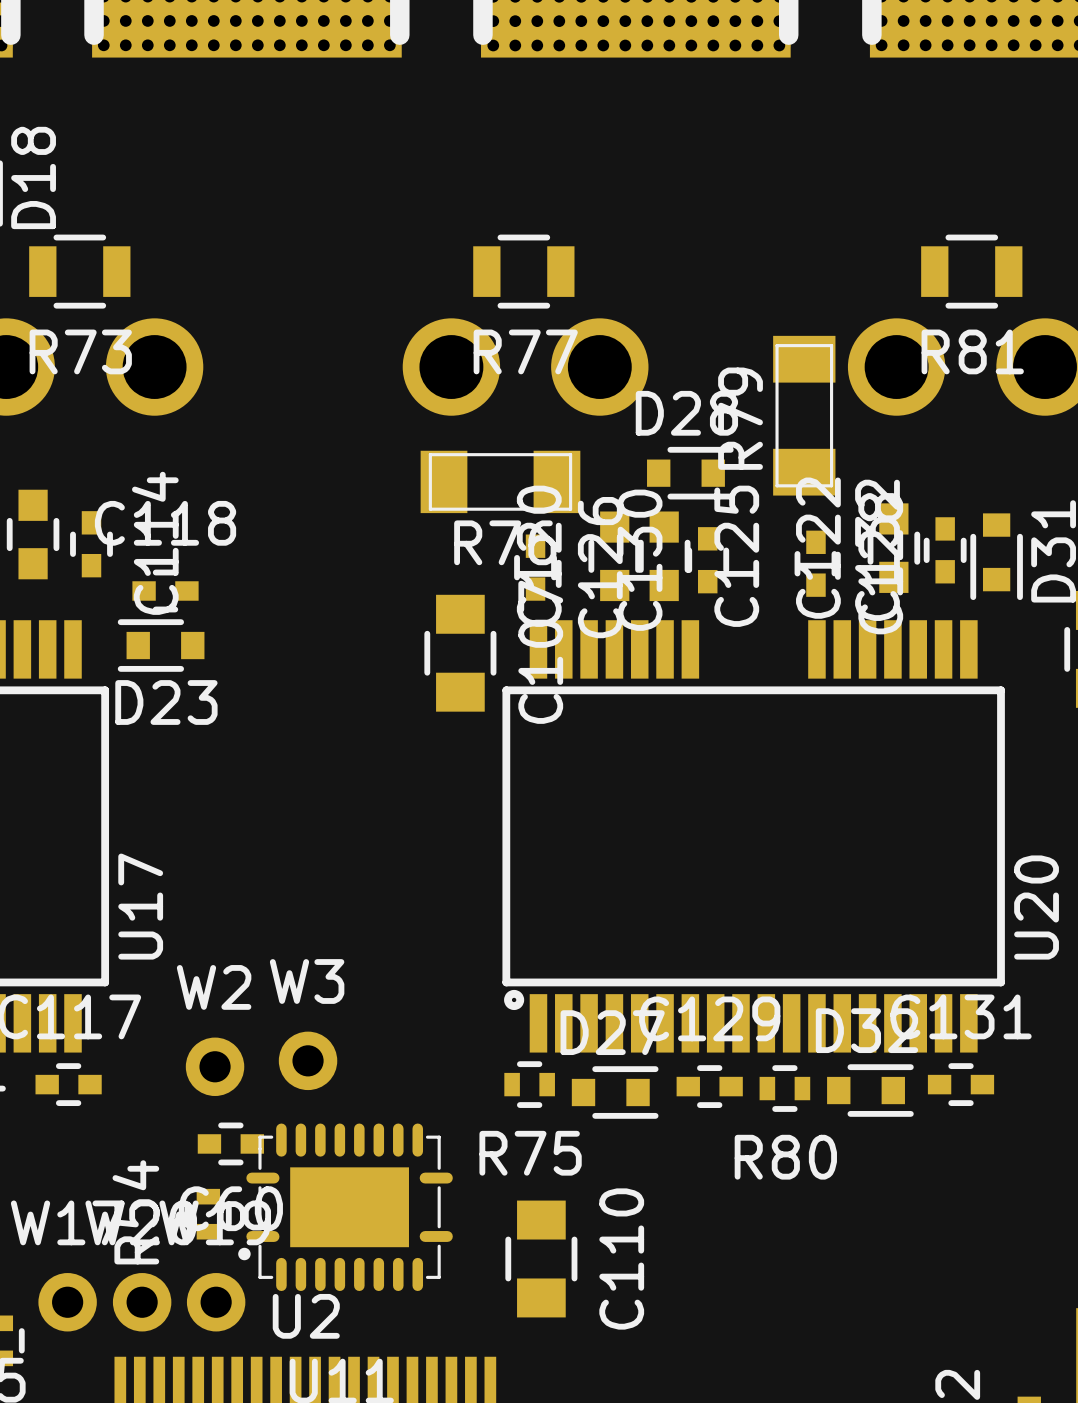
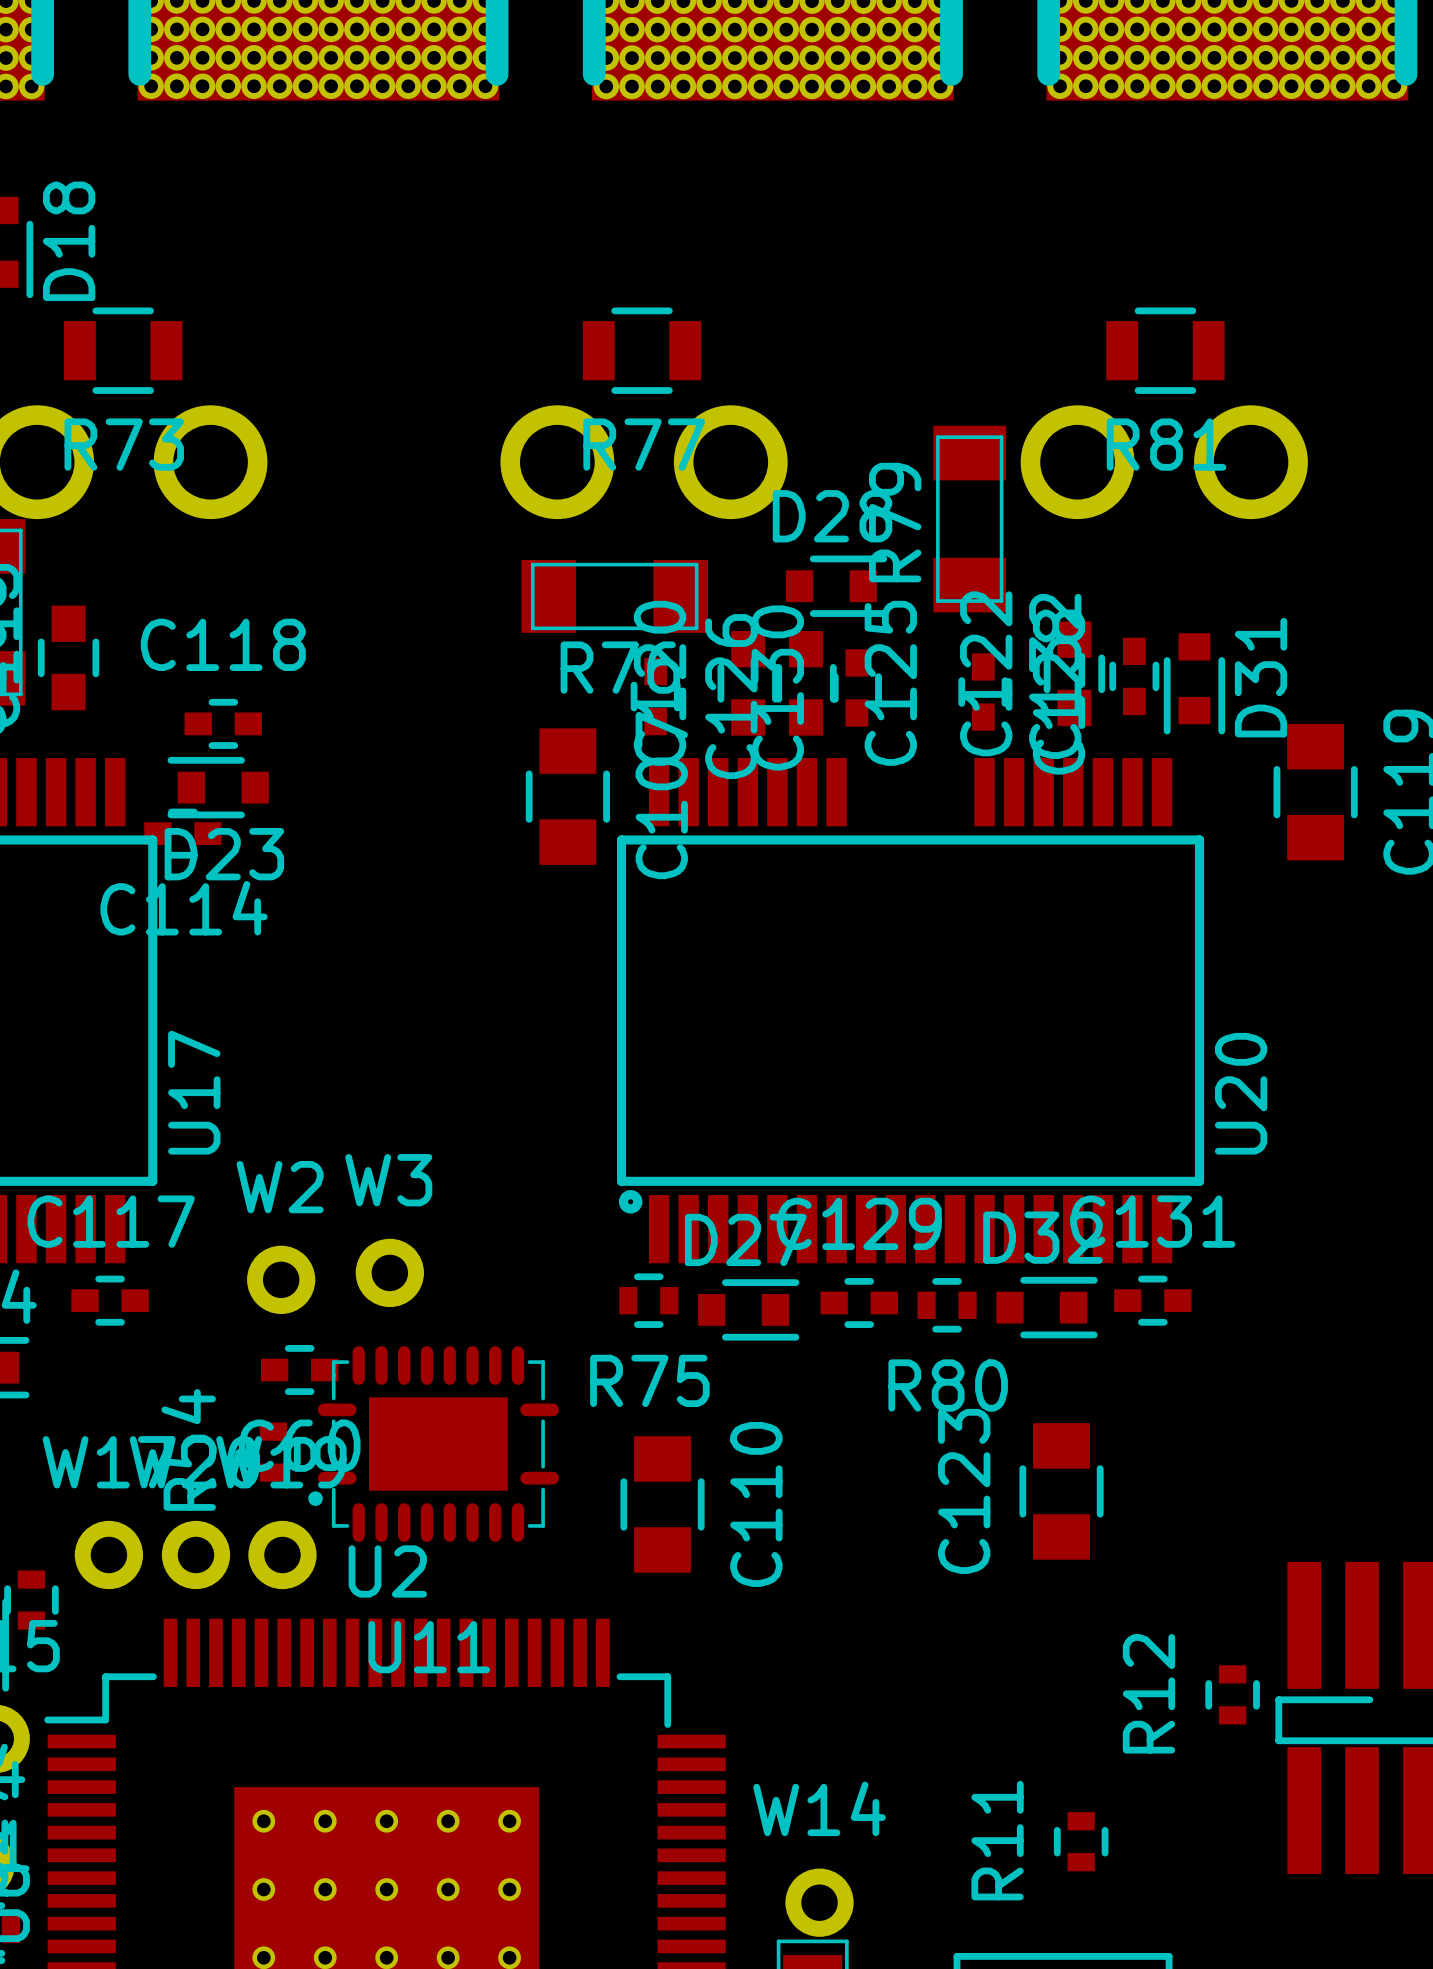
C114 rotation: 0° (91, 544) -> 90° clockwise (182, 833)
C114 position: (91, 544) -> (182, 833)
C123: none -> (1061, 1491)

